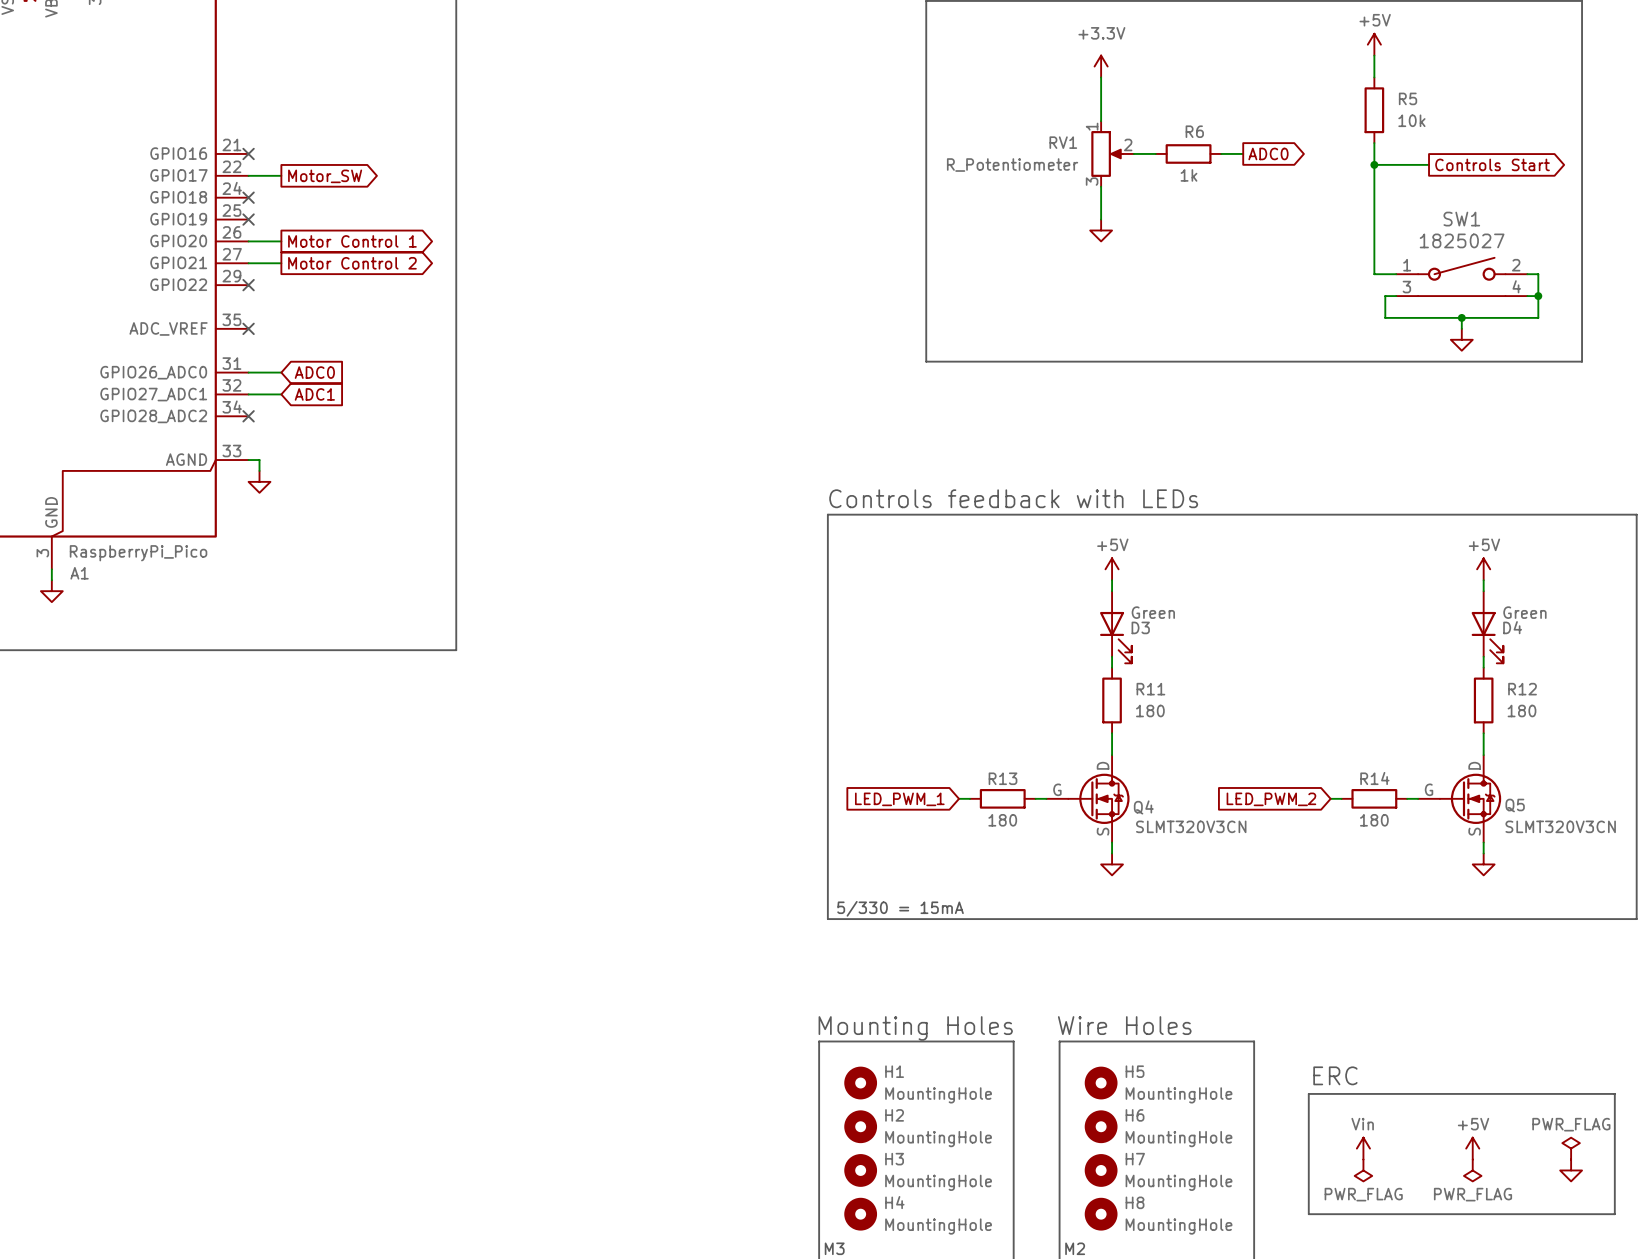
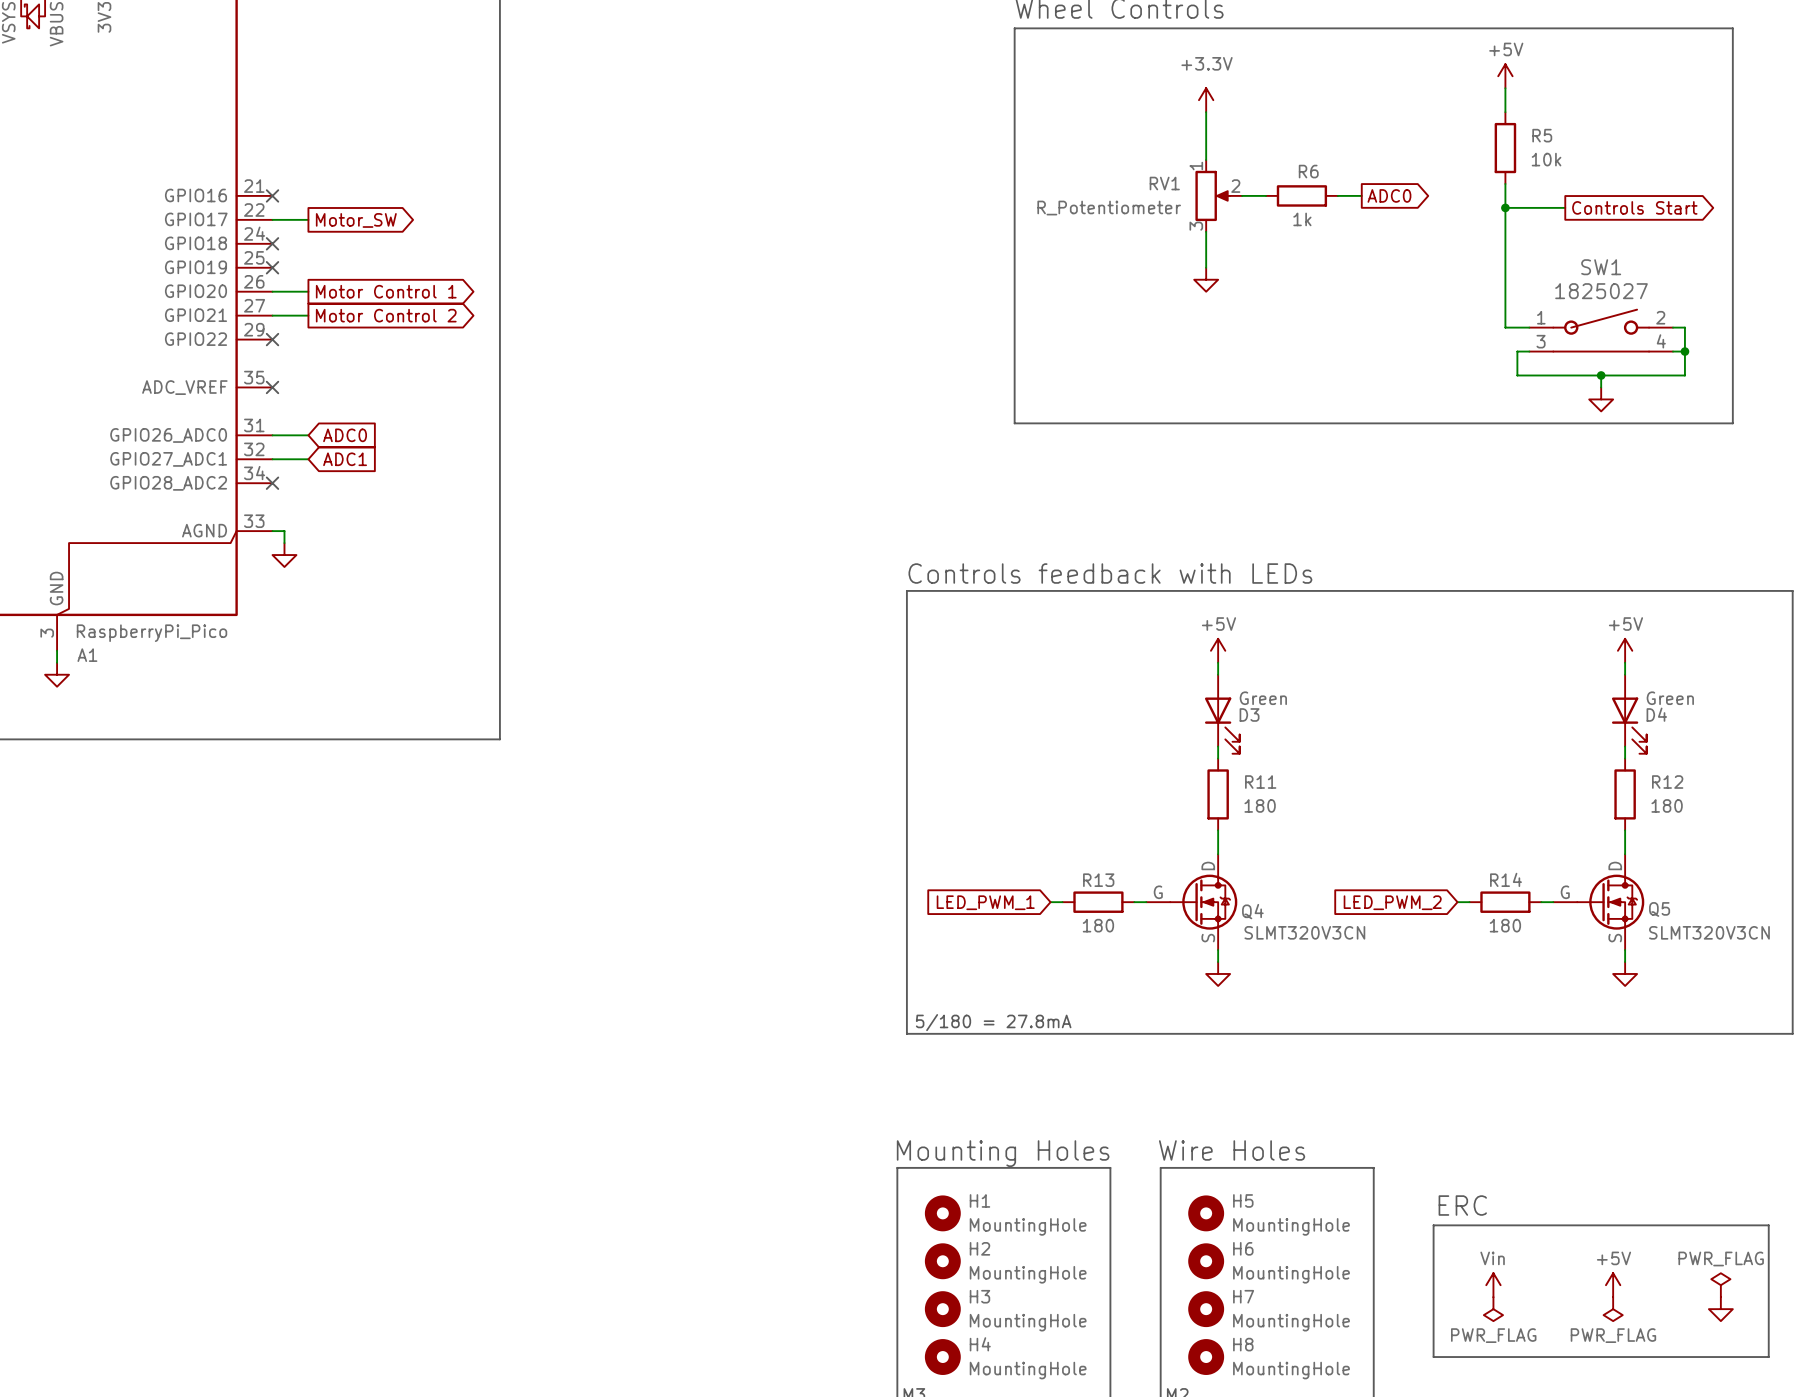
text: 5/330 = 15mA (900, 908) -> 5/180 = 27.8mA (993, 1022)

